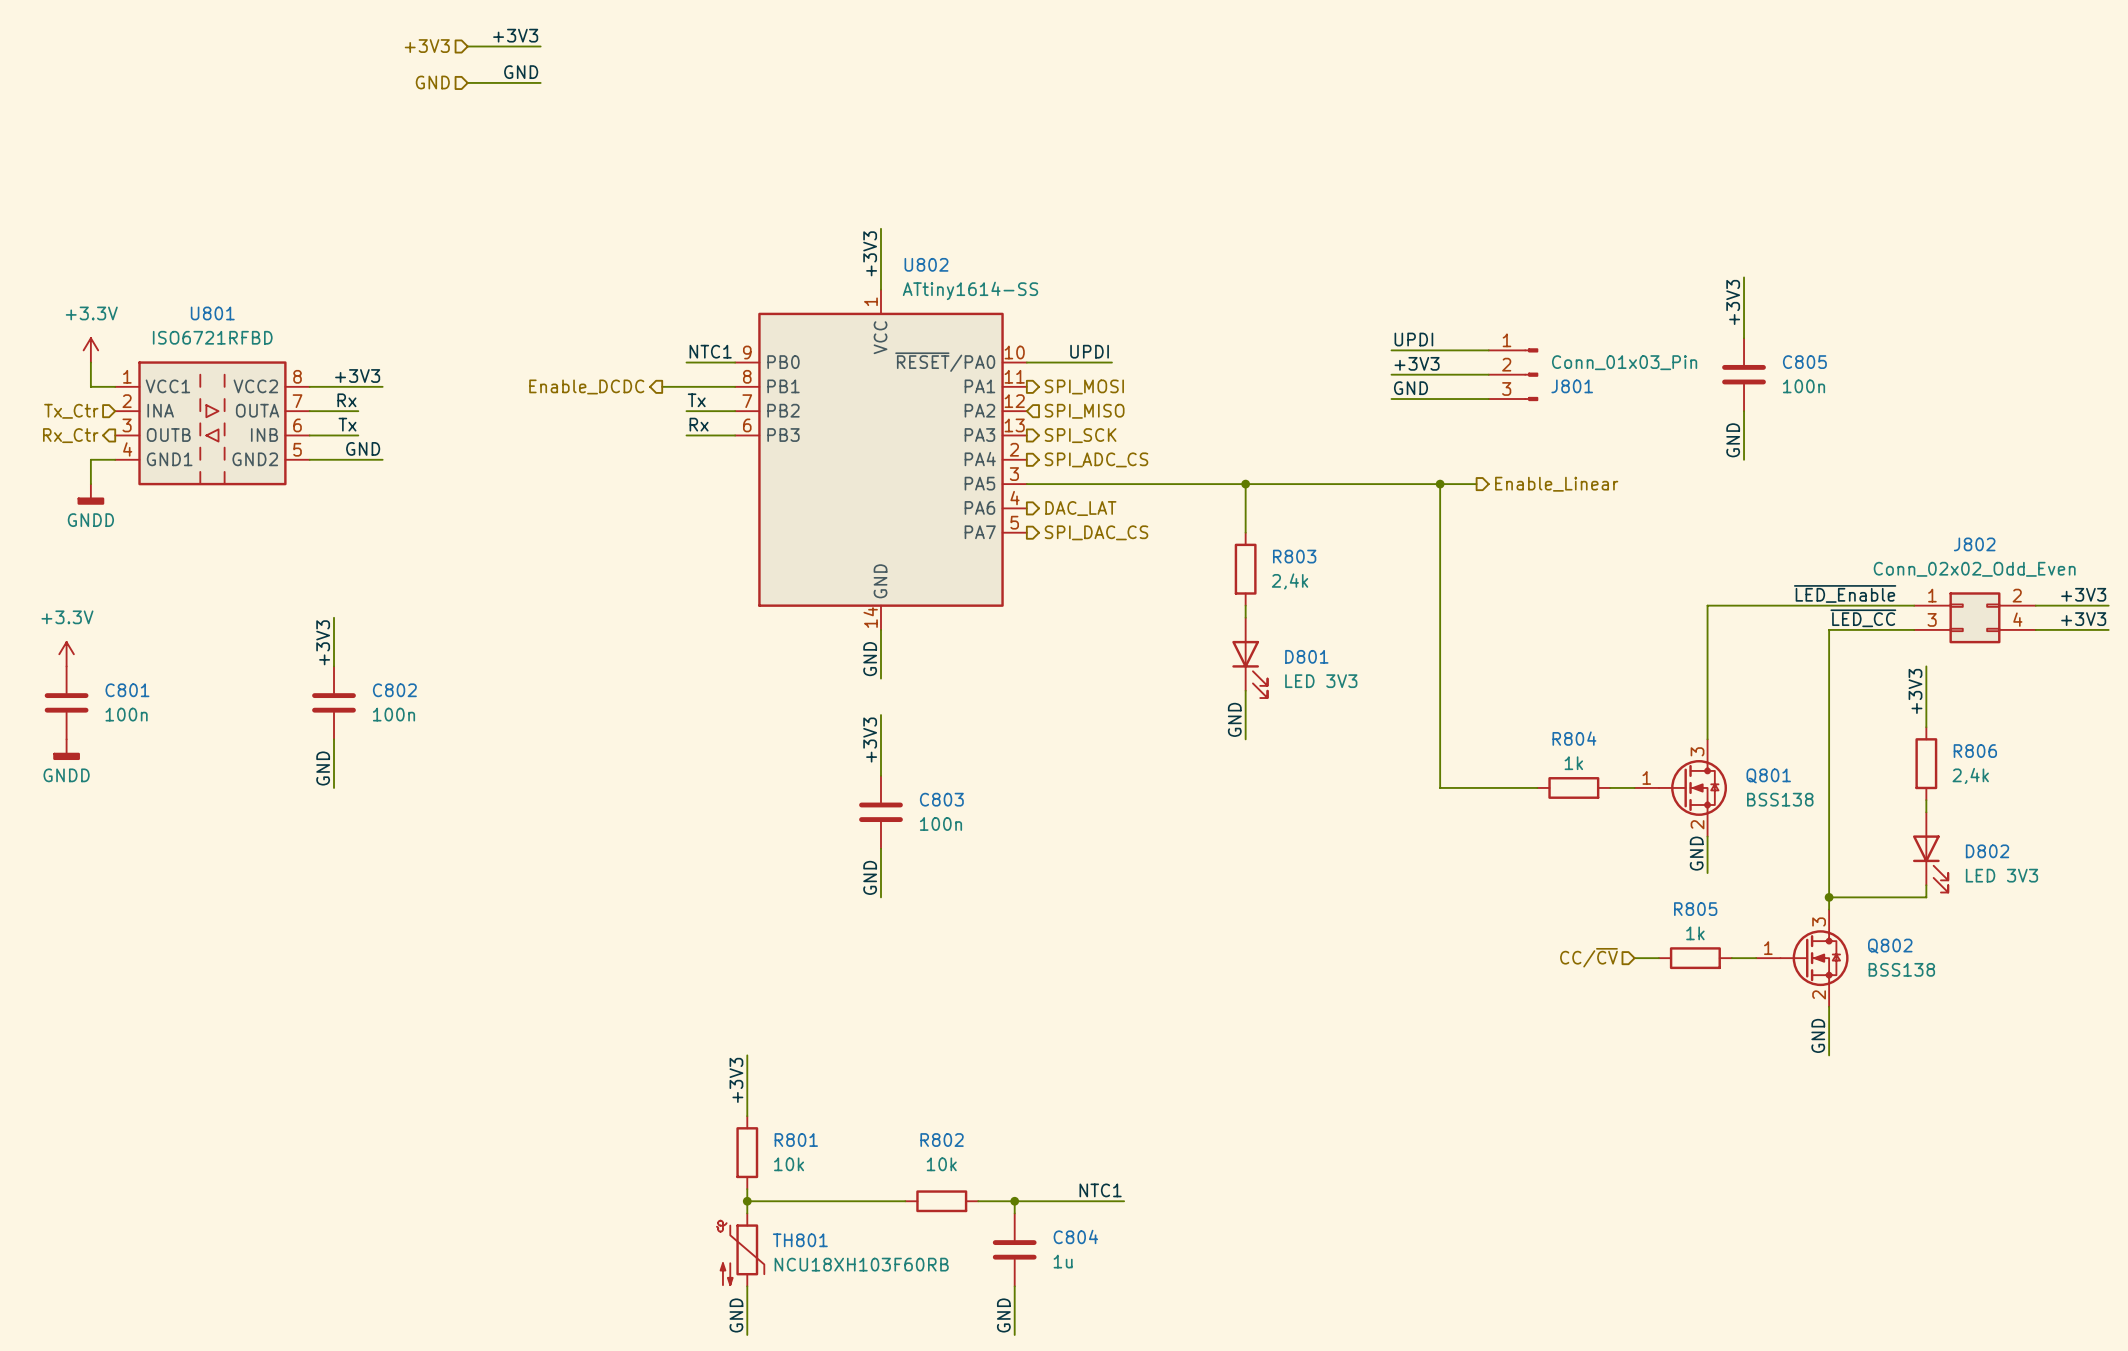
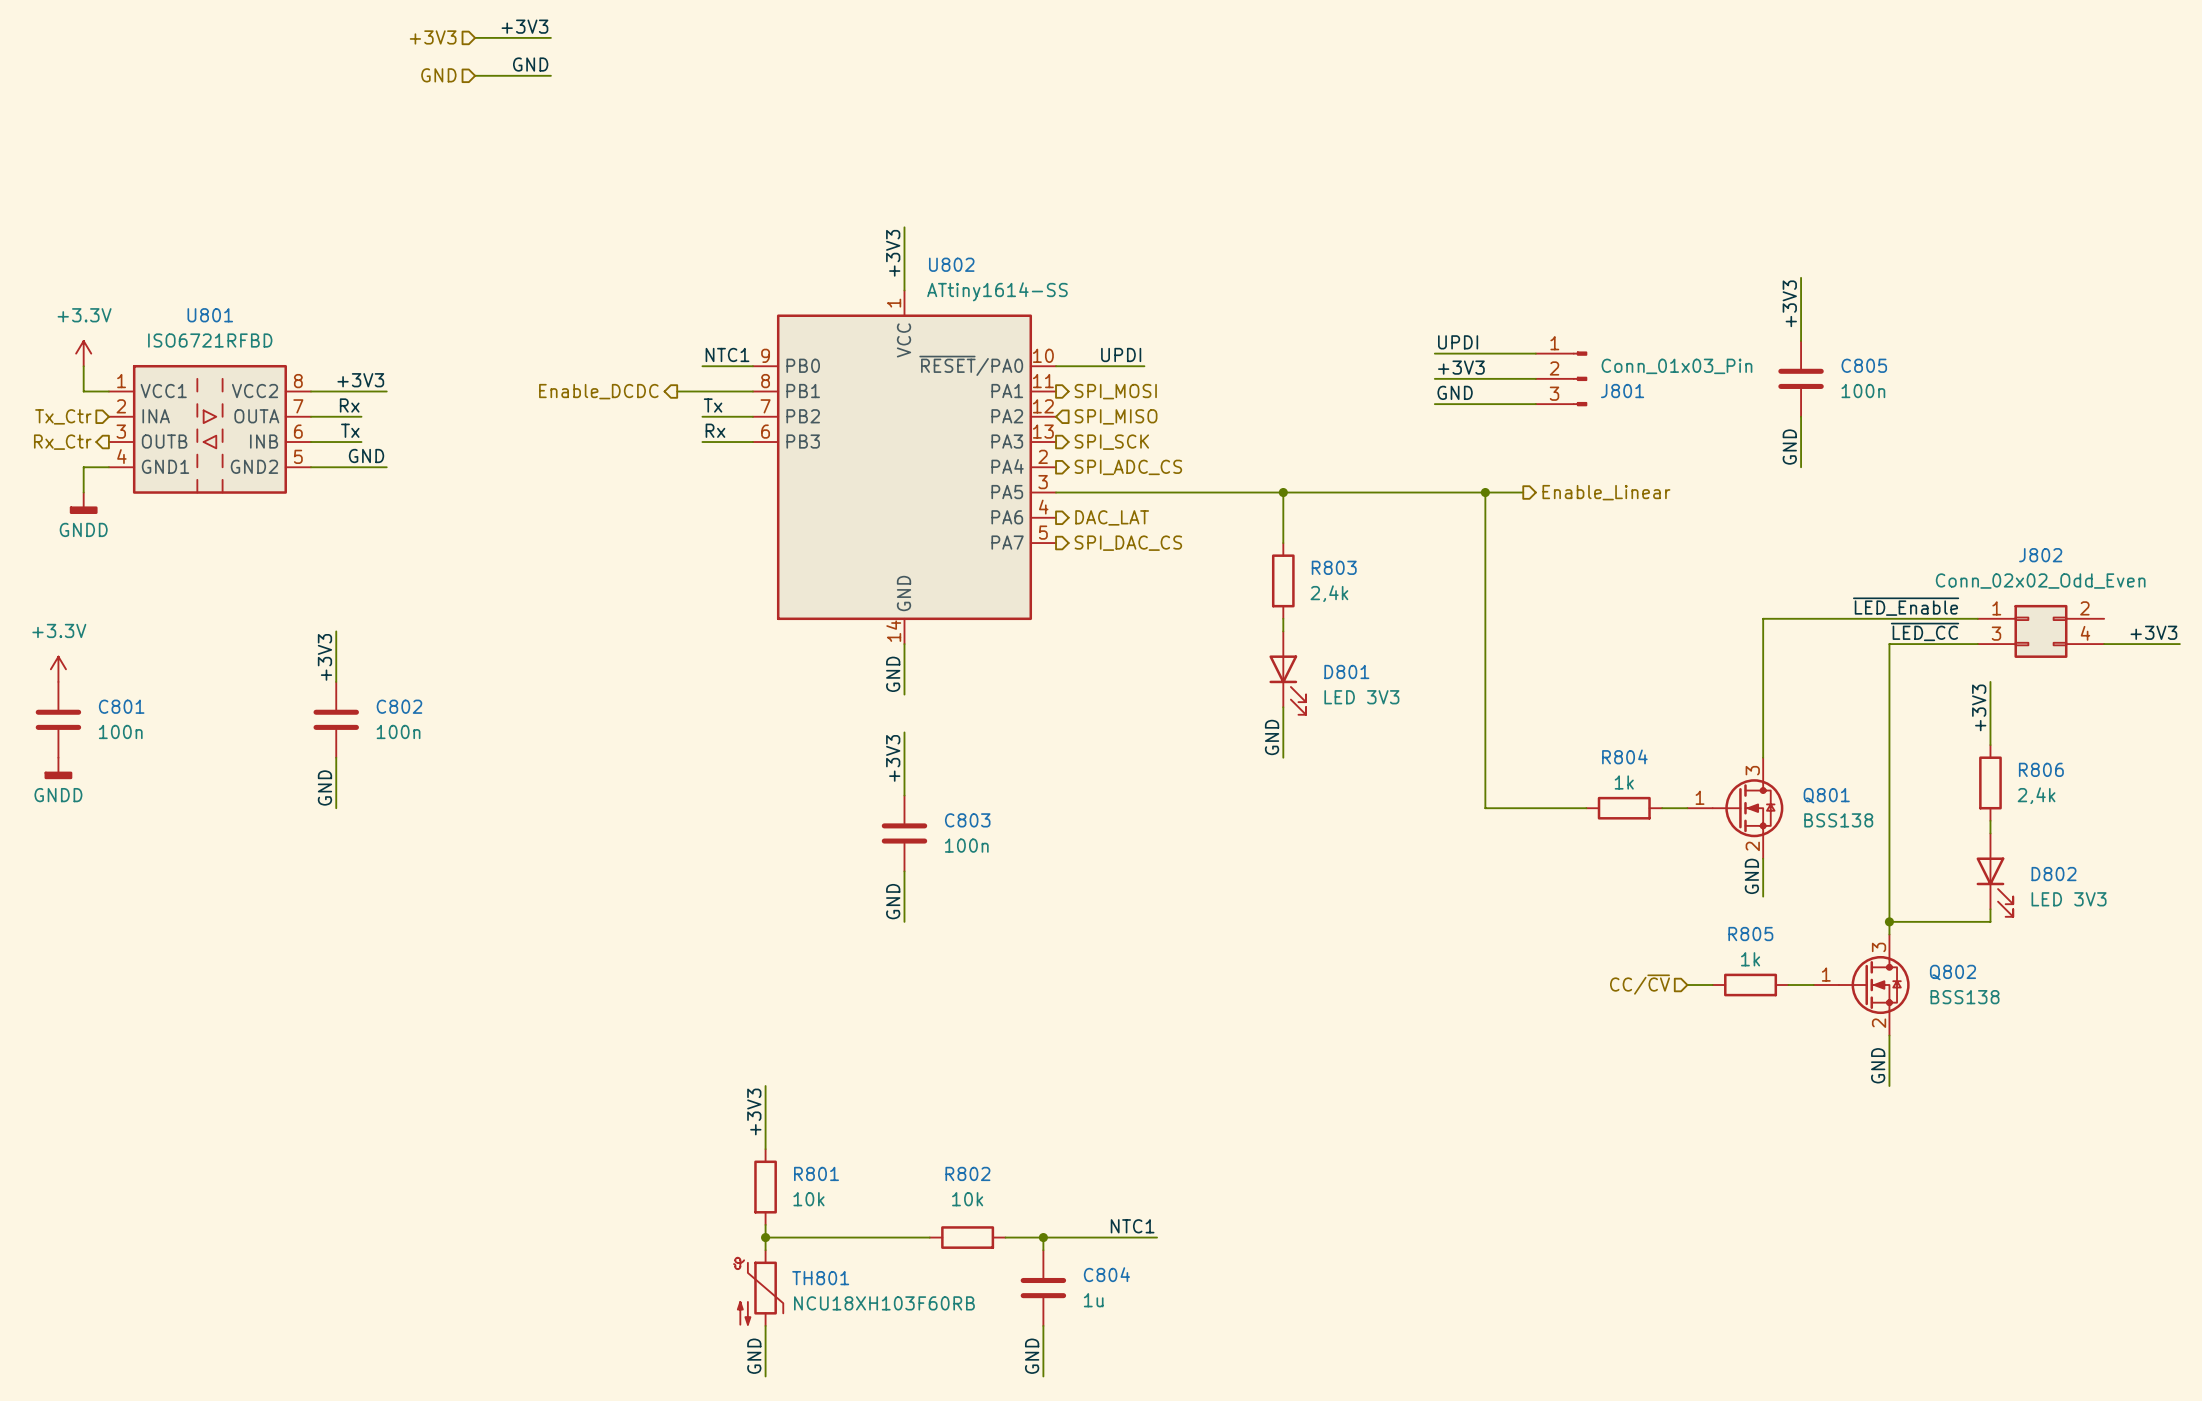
label: +3V3 (2083, 594) -> none
wire: (2035, 605) (2108, 605) -> none

